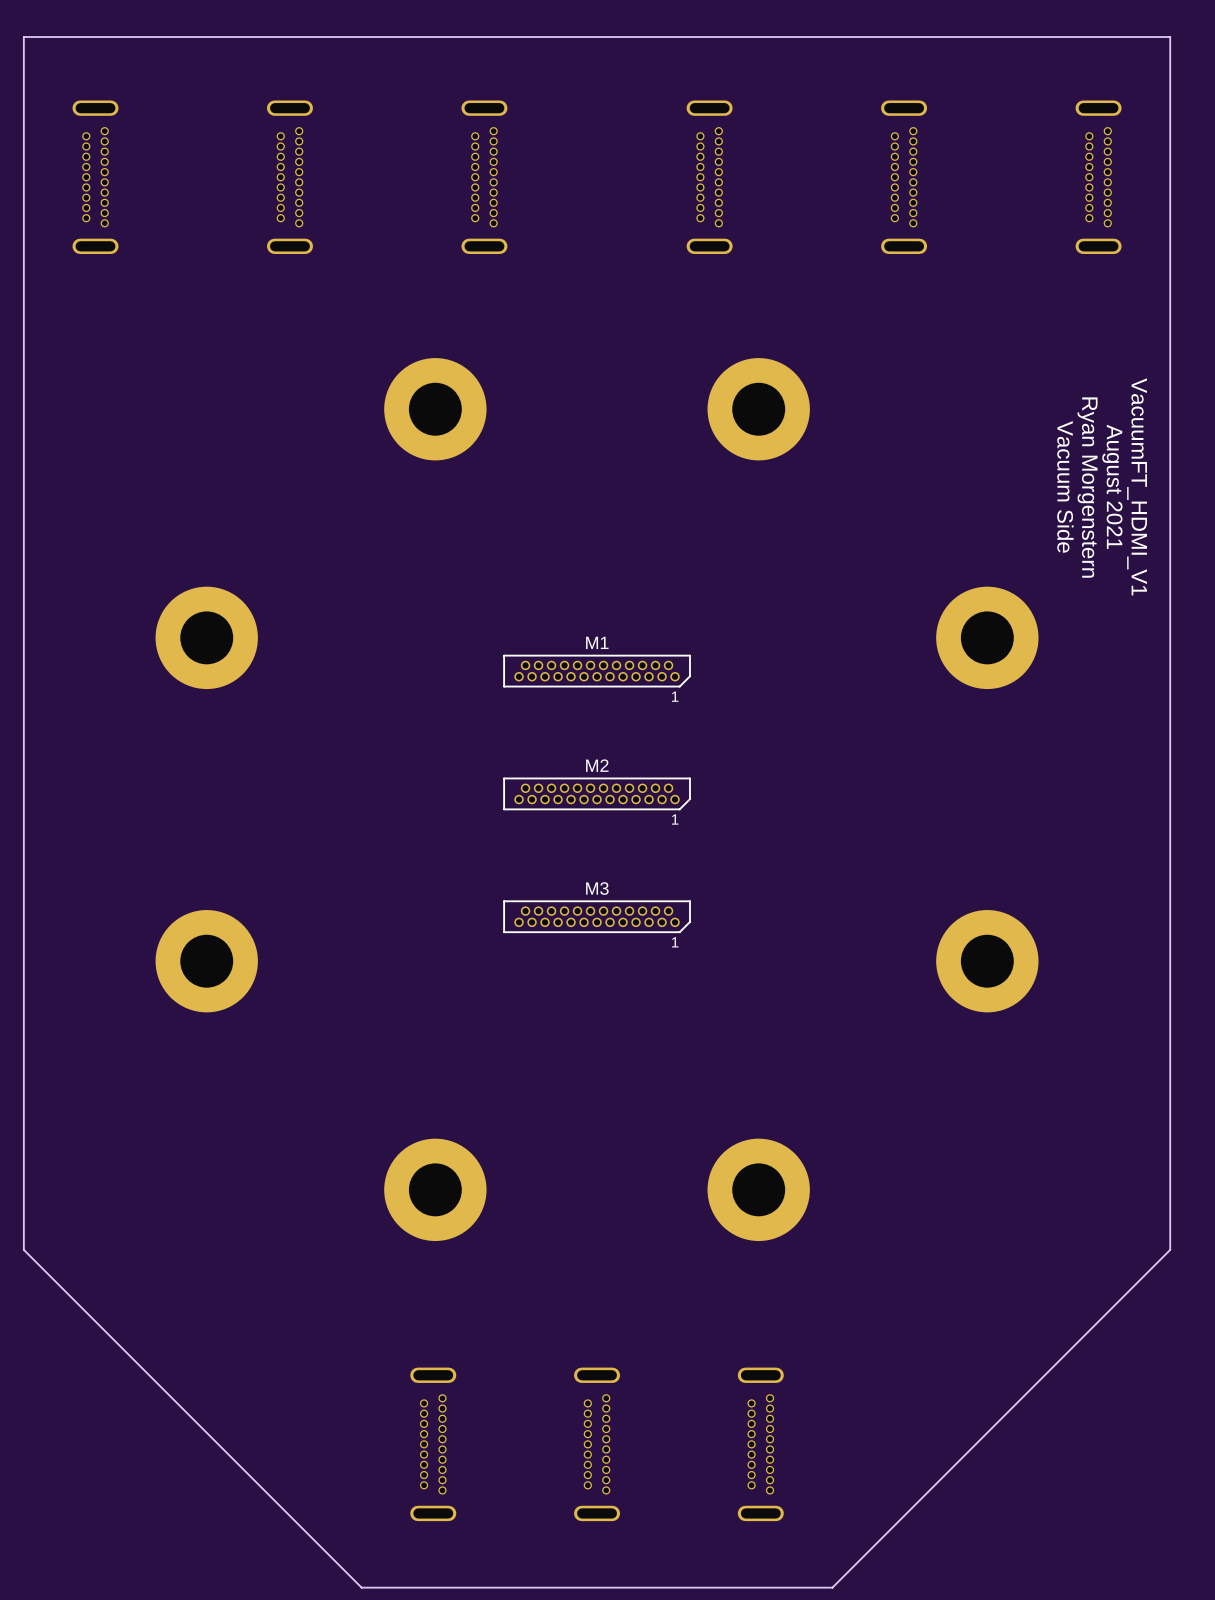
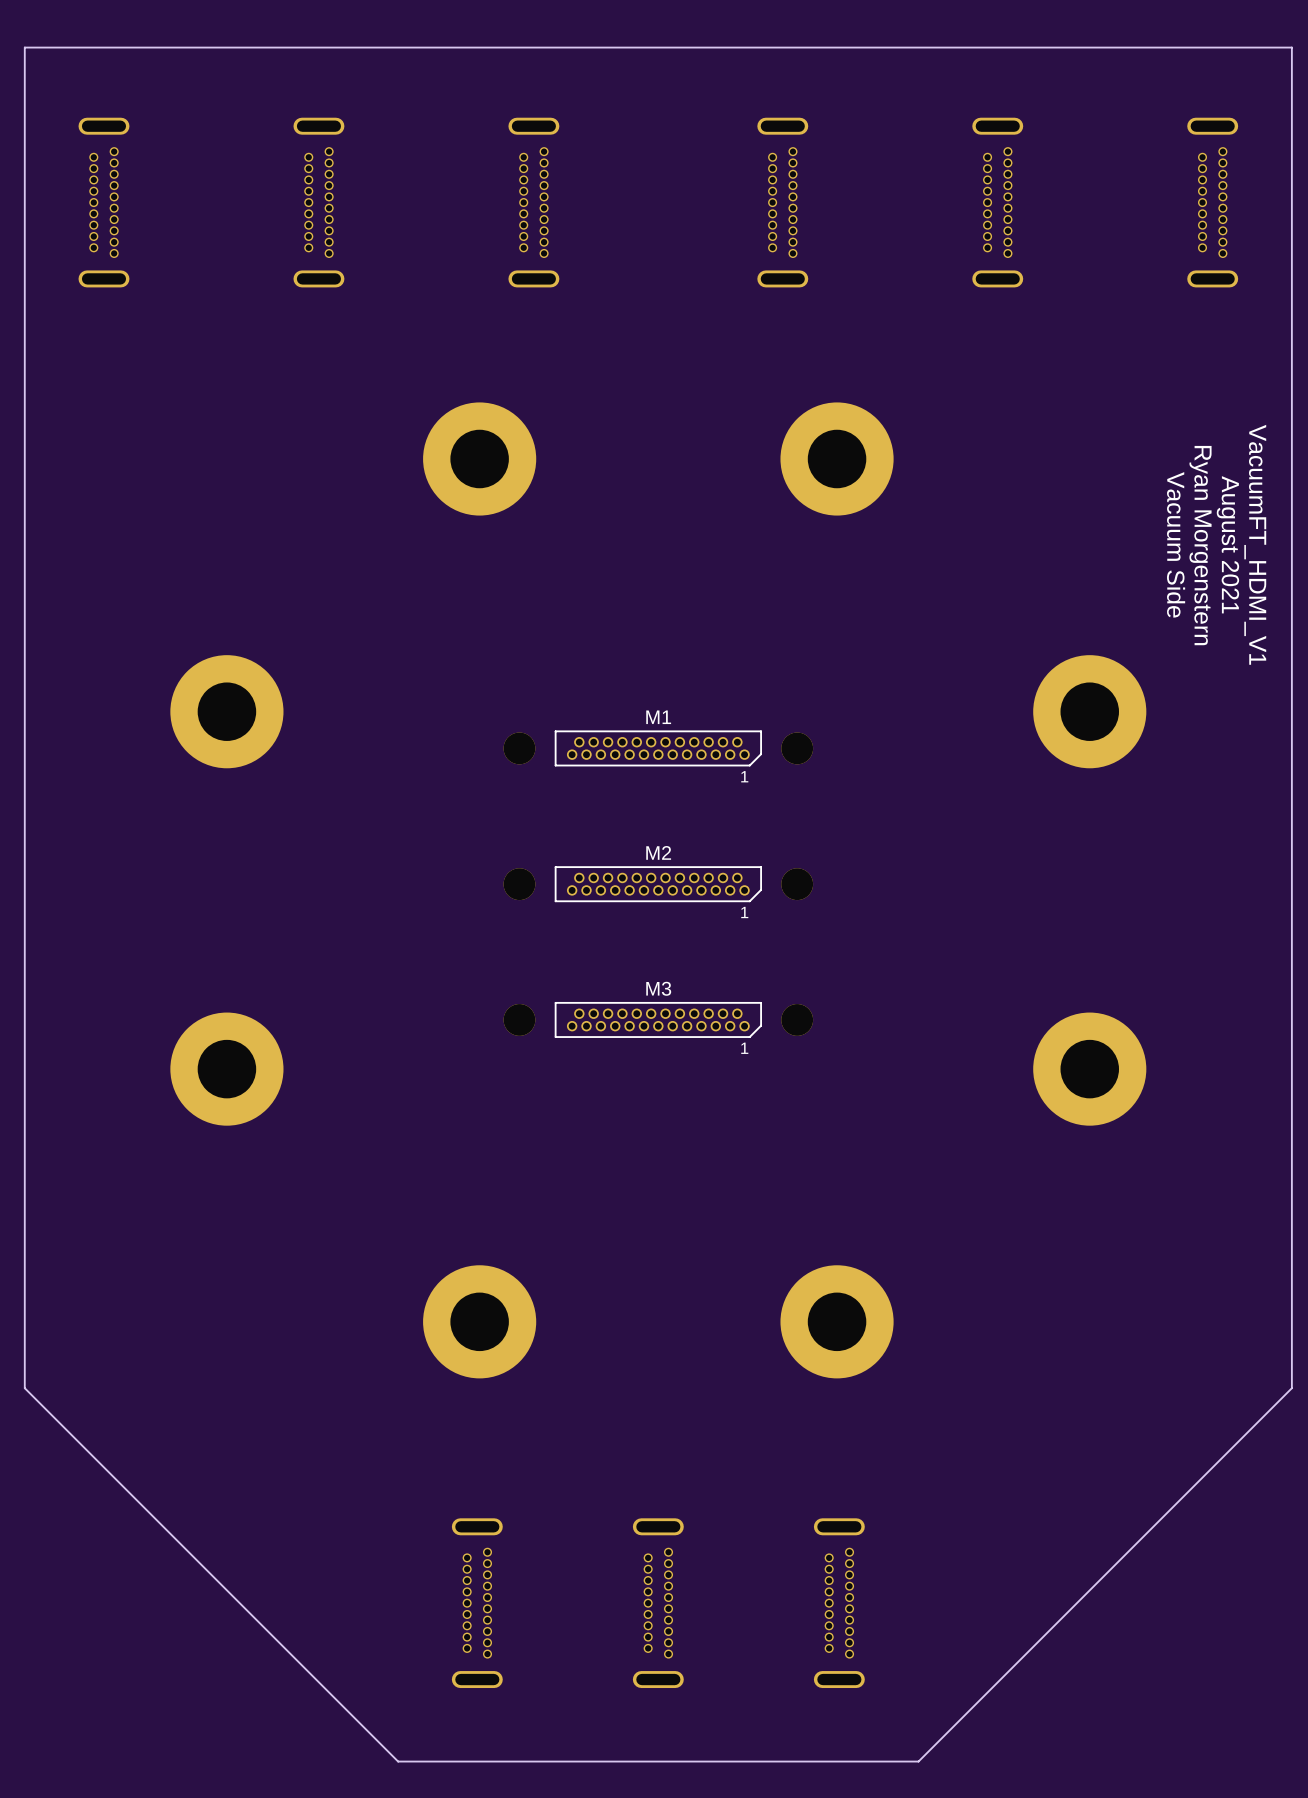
M1 footprint: [503, 654, 691, 688] -> [503, 730, 814, 767]
M2 footprint: [503, 777, 691, 811] -> [503, 866, 814, 903]
M3 footprint: [503, 900, 691, 933] -> [503, 1002, 814, 1038]

